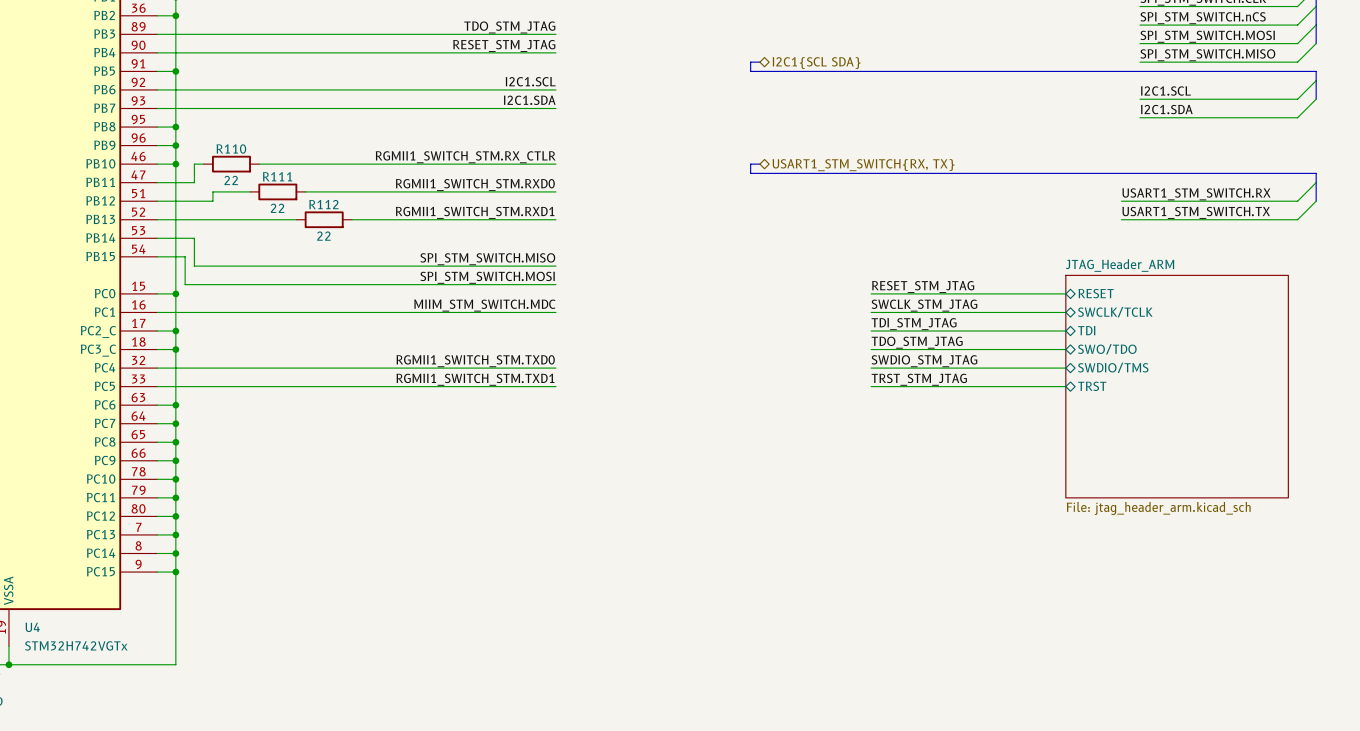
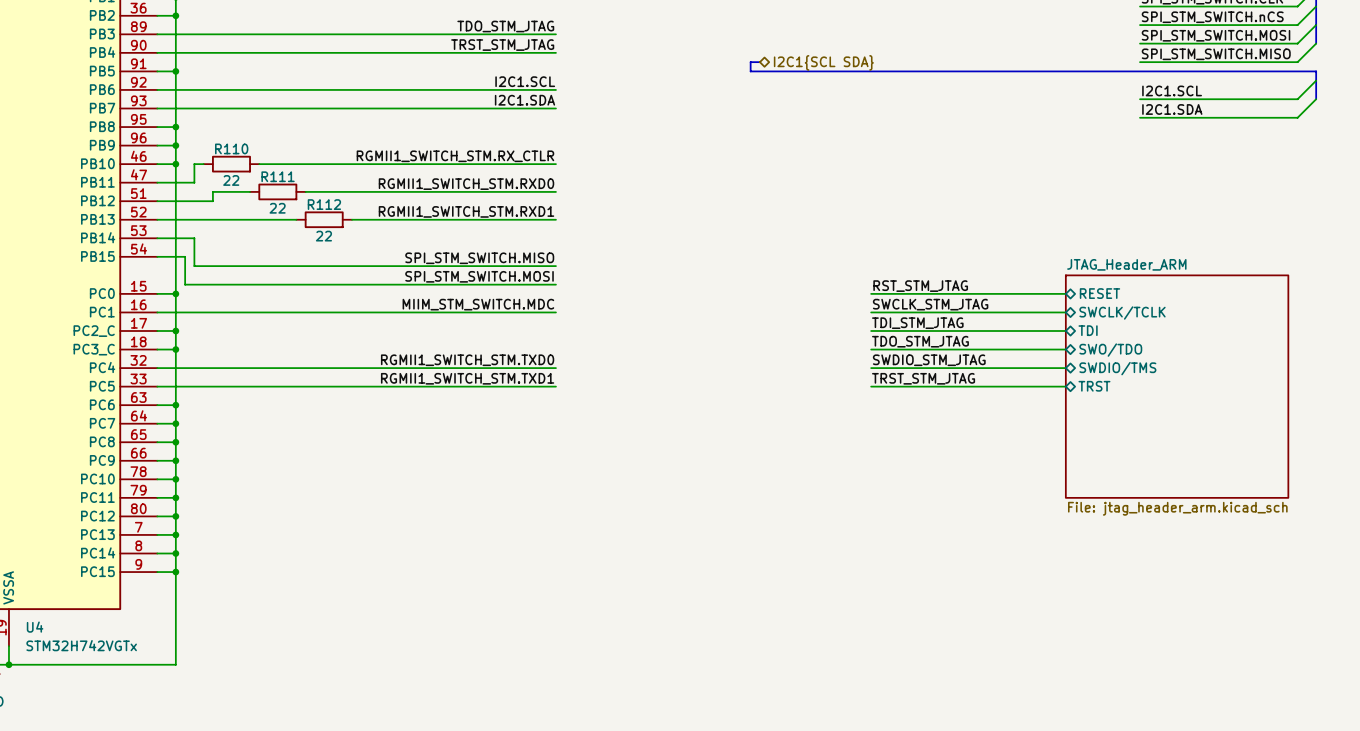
label: RESET_STM_JTAG (504, 45) -> TRST_STM_JTAG (502, 45)
bus: (759, 164) (750, 164) (750, 173) (1316, 173) (1316, 201) -> none
hierarchical label: USART1_STM_SWITCH{RX, TX} (863, 165) -> none
wire: (1316, 182) (1297, 201) (1121, 201) -> none
label: USART1_STM_SWITCH.RX (1196, 194) -> none
wire: (1316, 201) (1297, 219) (1121, 219) -> none
label: USART1_STM_SWITCH.TX (1196, 212) -> none
label: RESET_STM_JTAG (923, 287) -> RST_STM_JTAG (920, 286)

